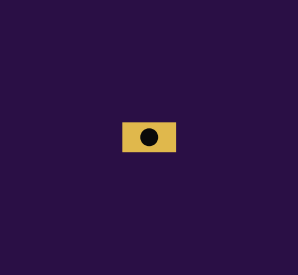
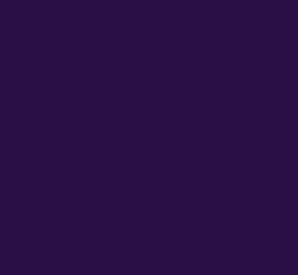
part: (149, 137) -> none

